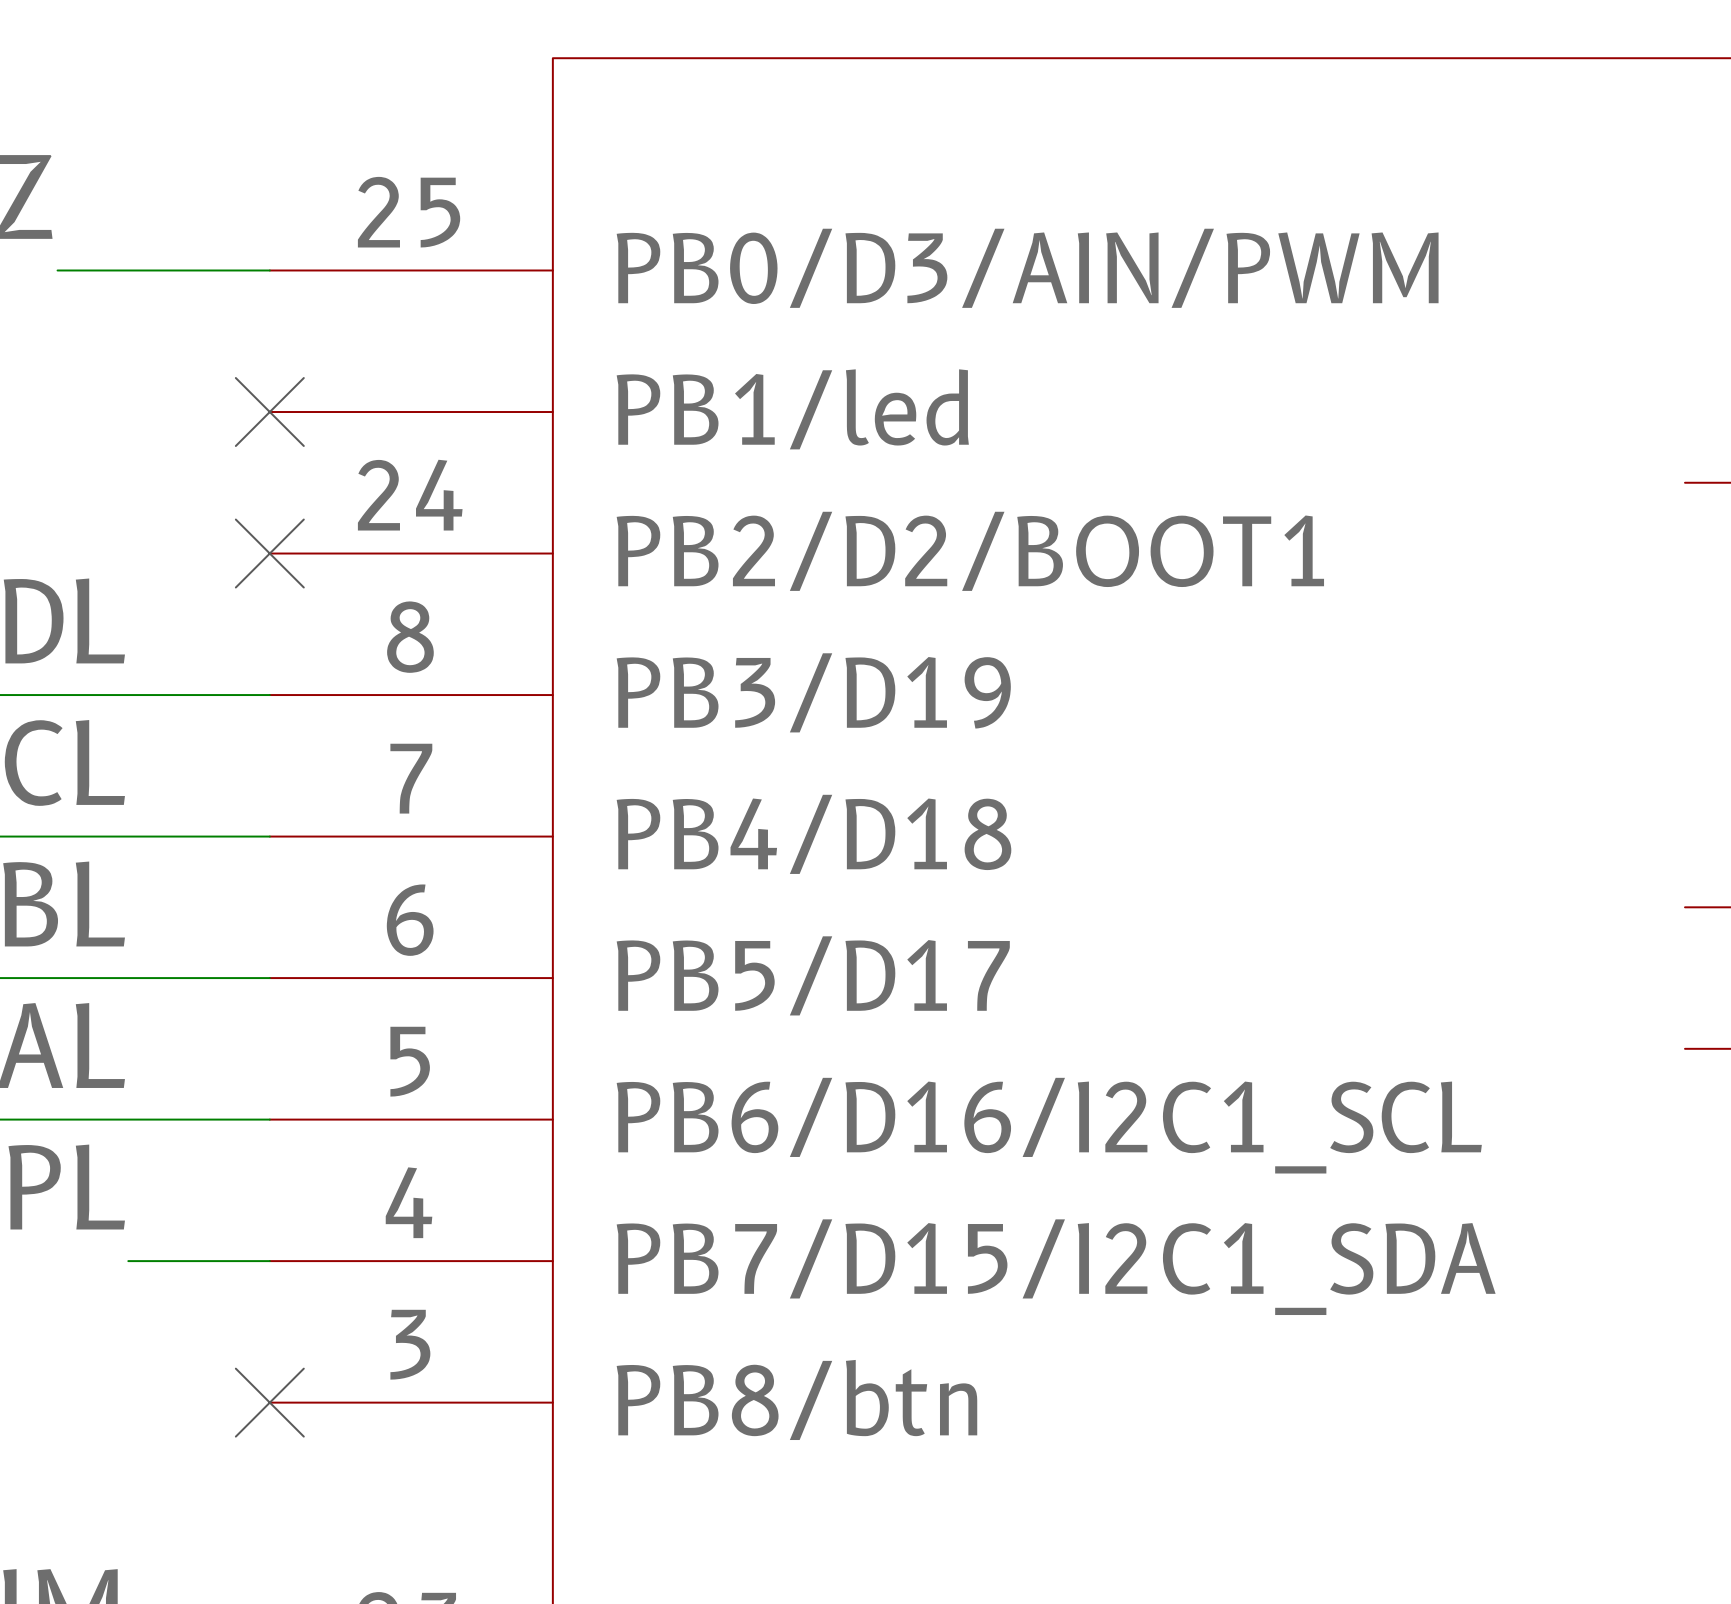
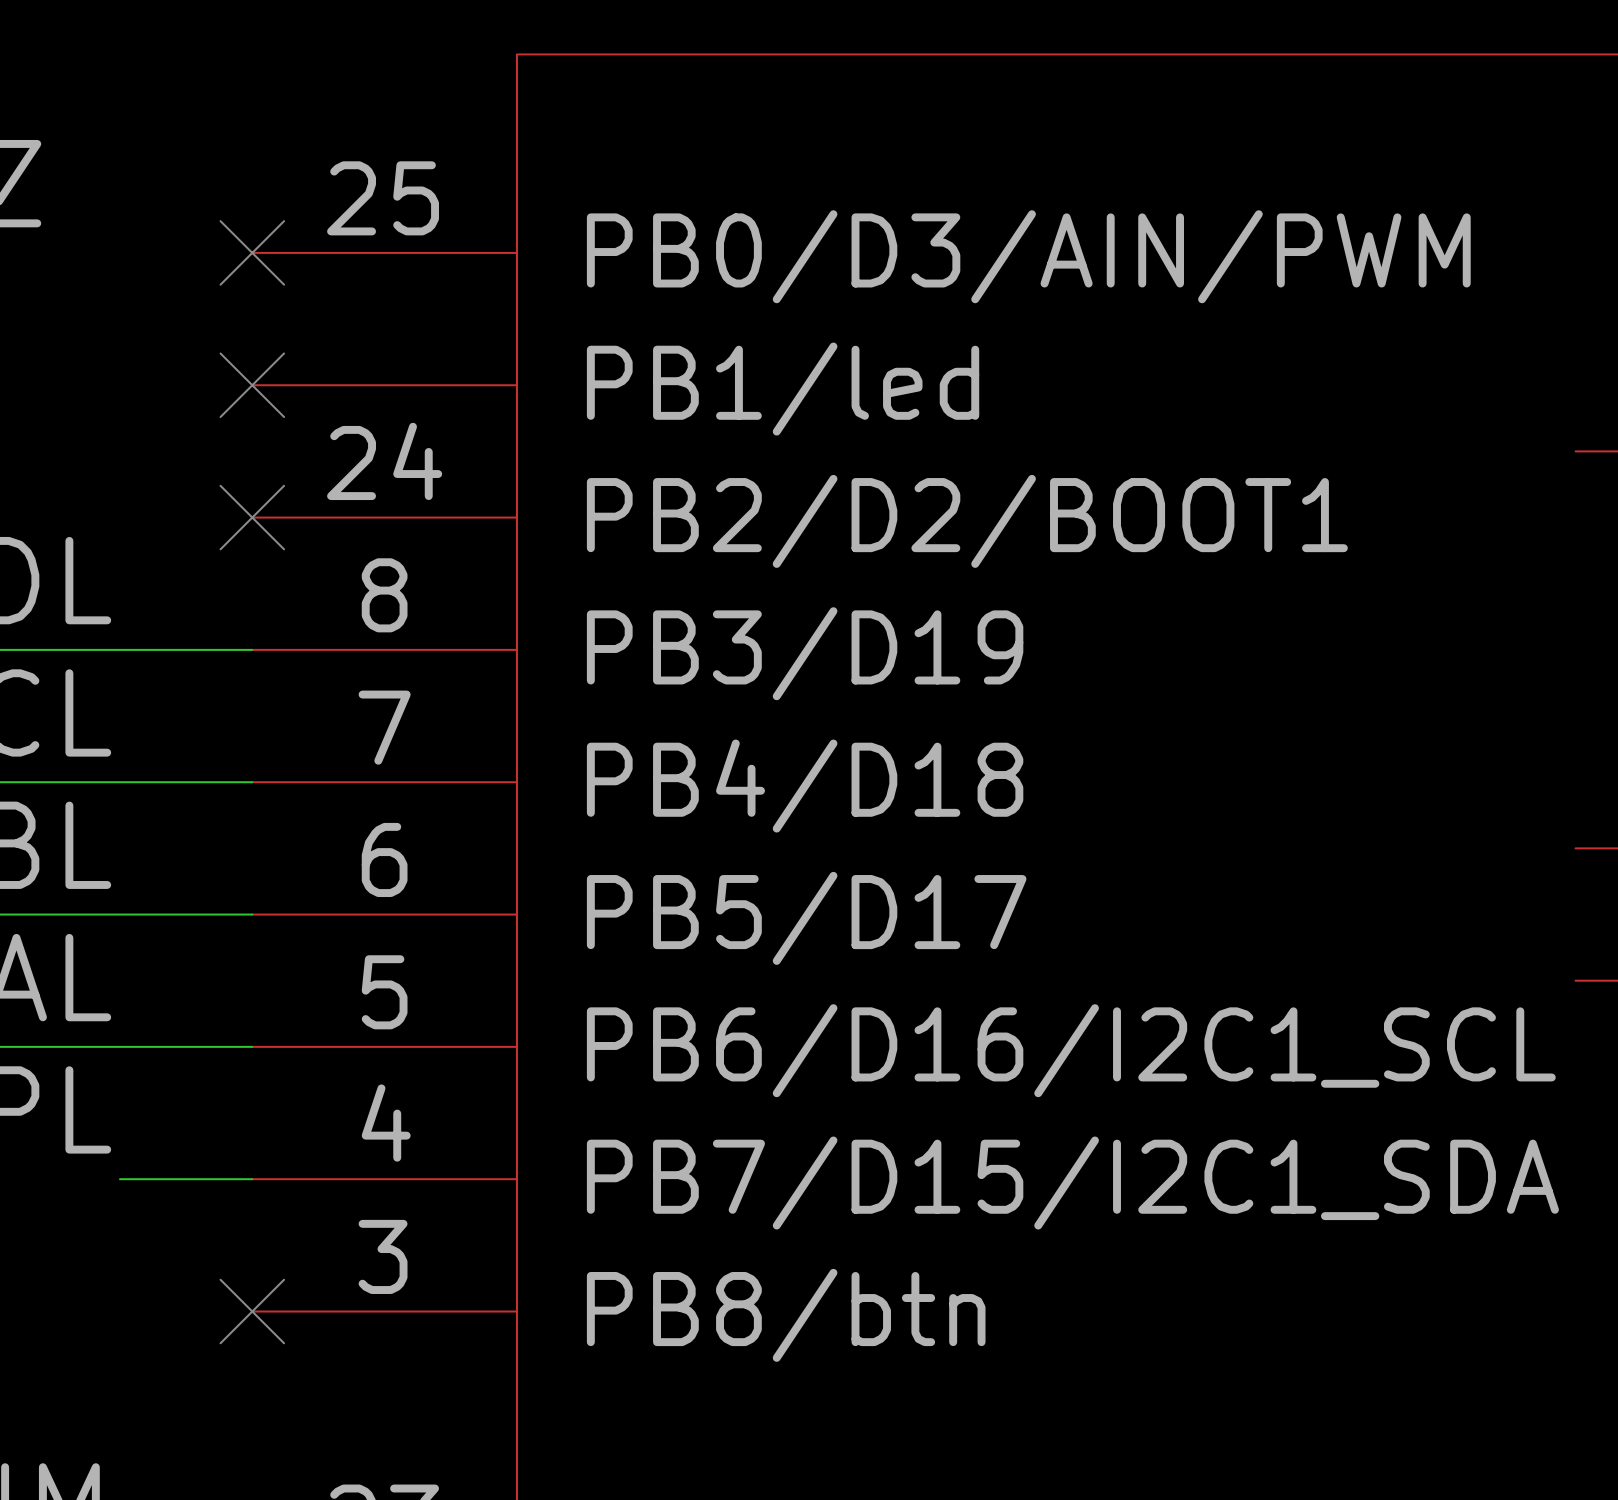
wire: (57, 270) (269, 270) -> none
no-connect mark: none -> (252, 252)

